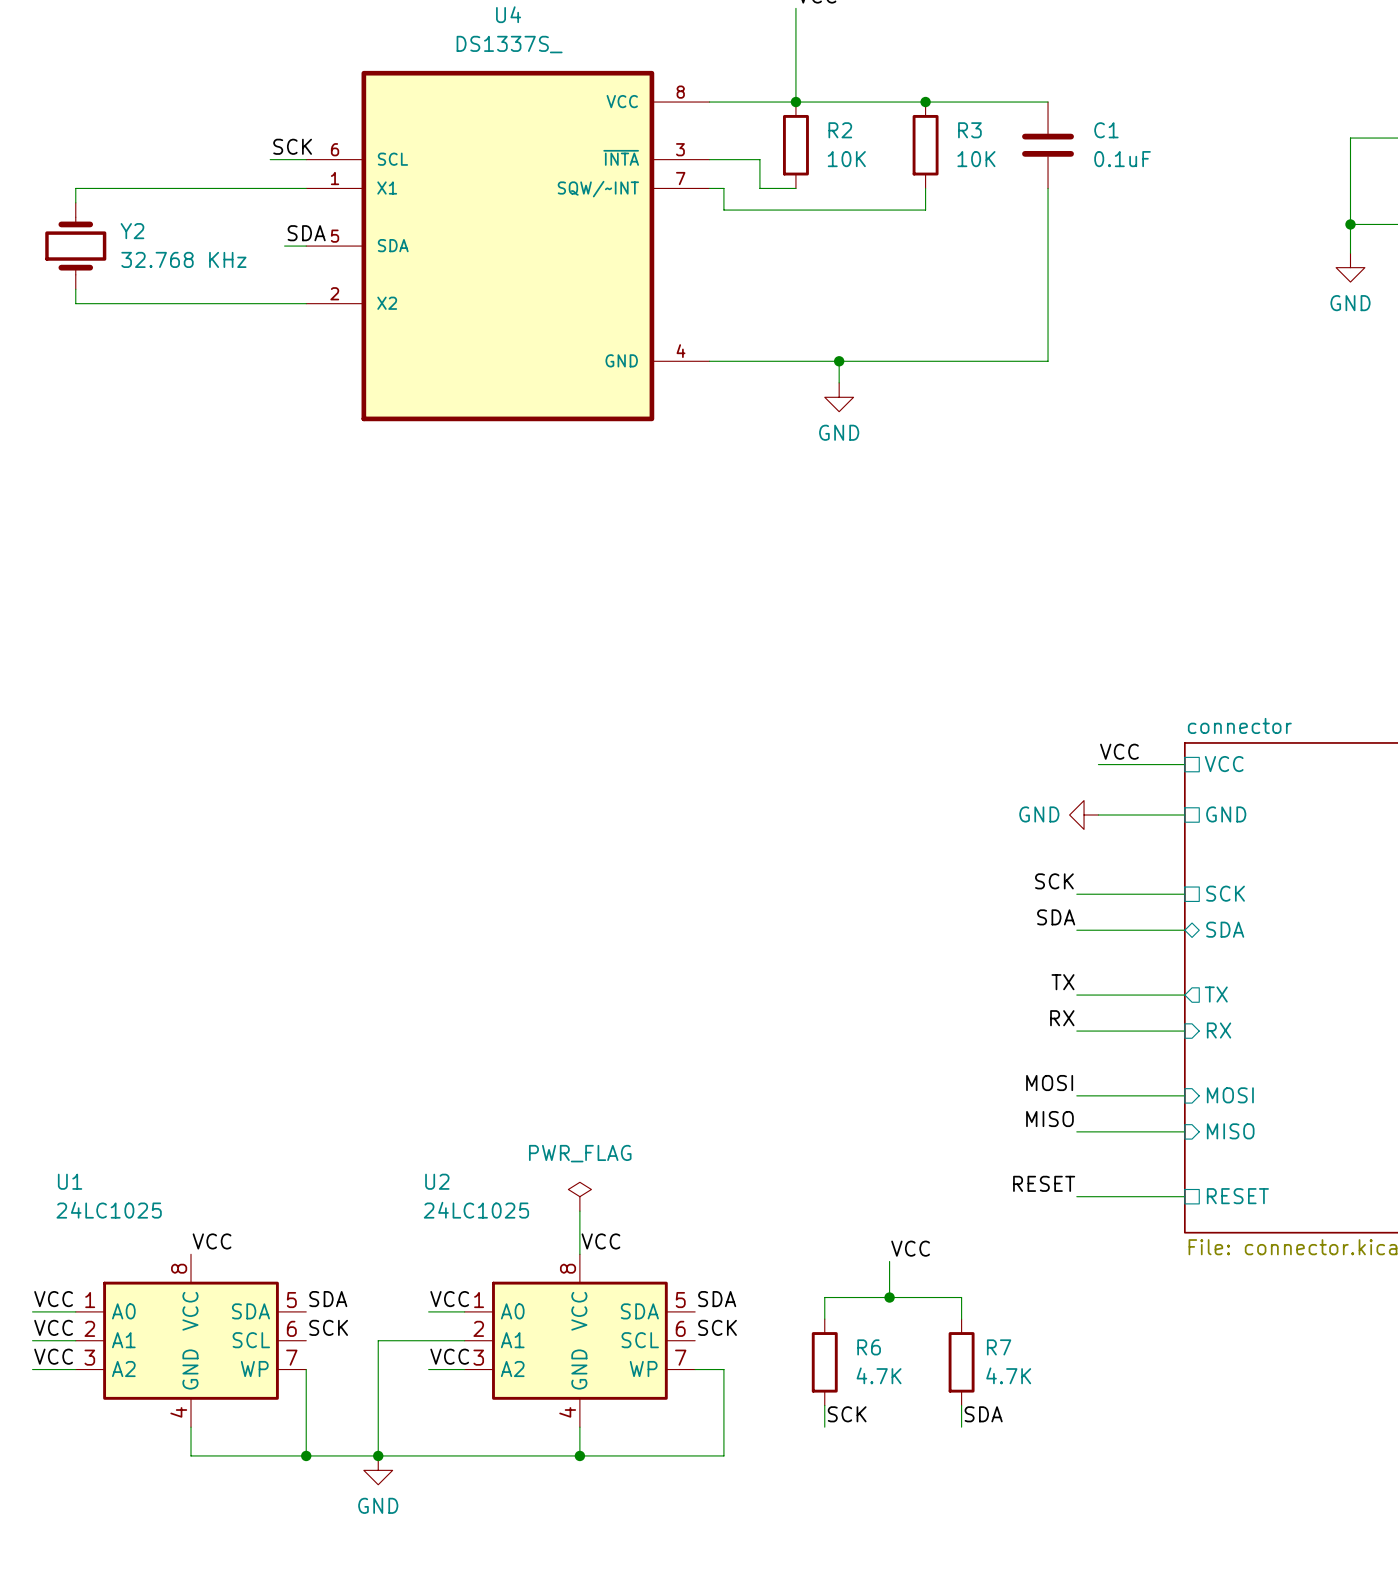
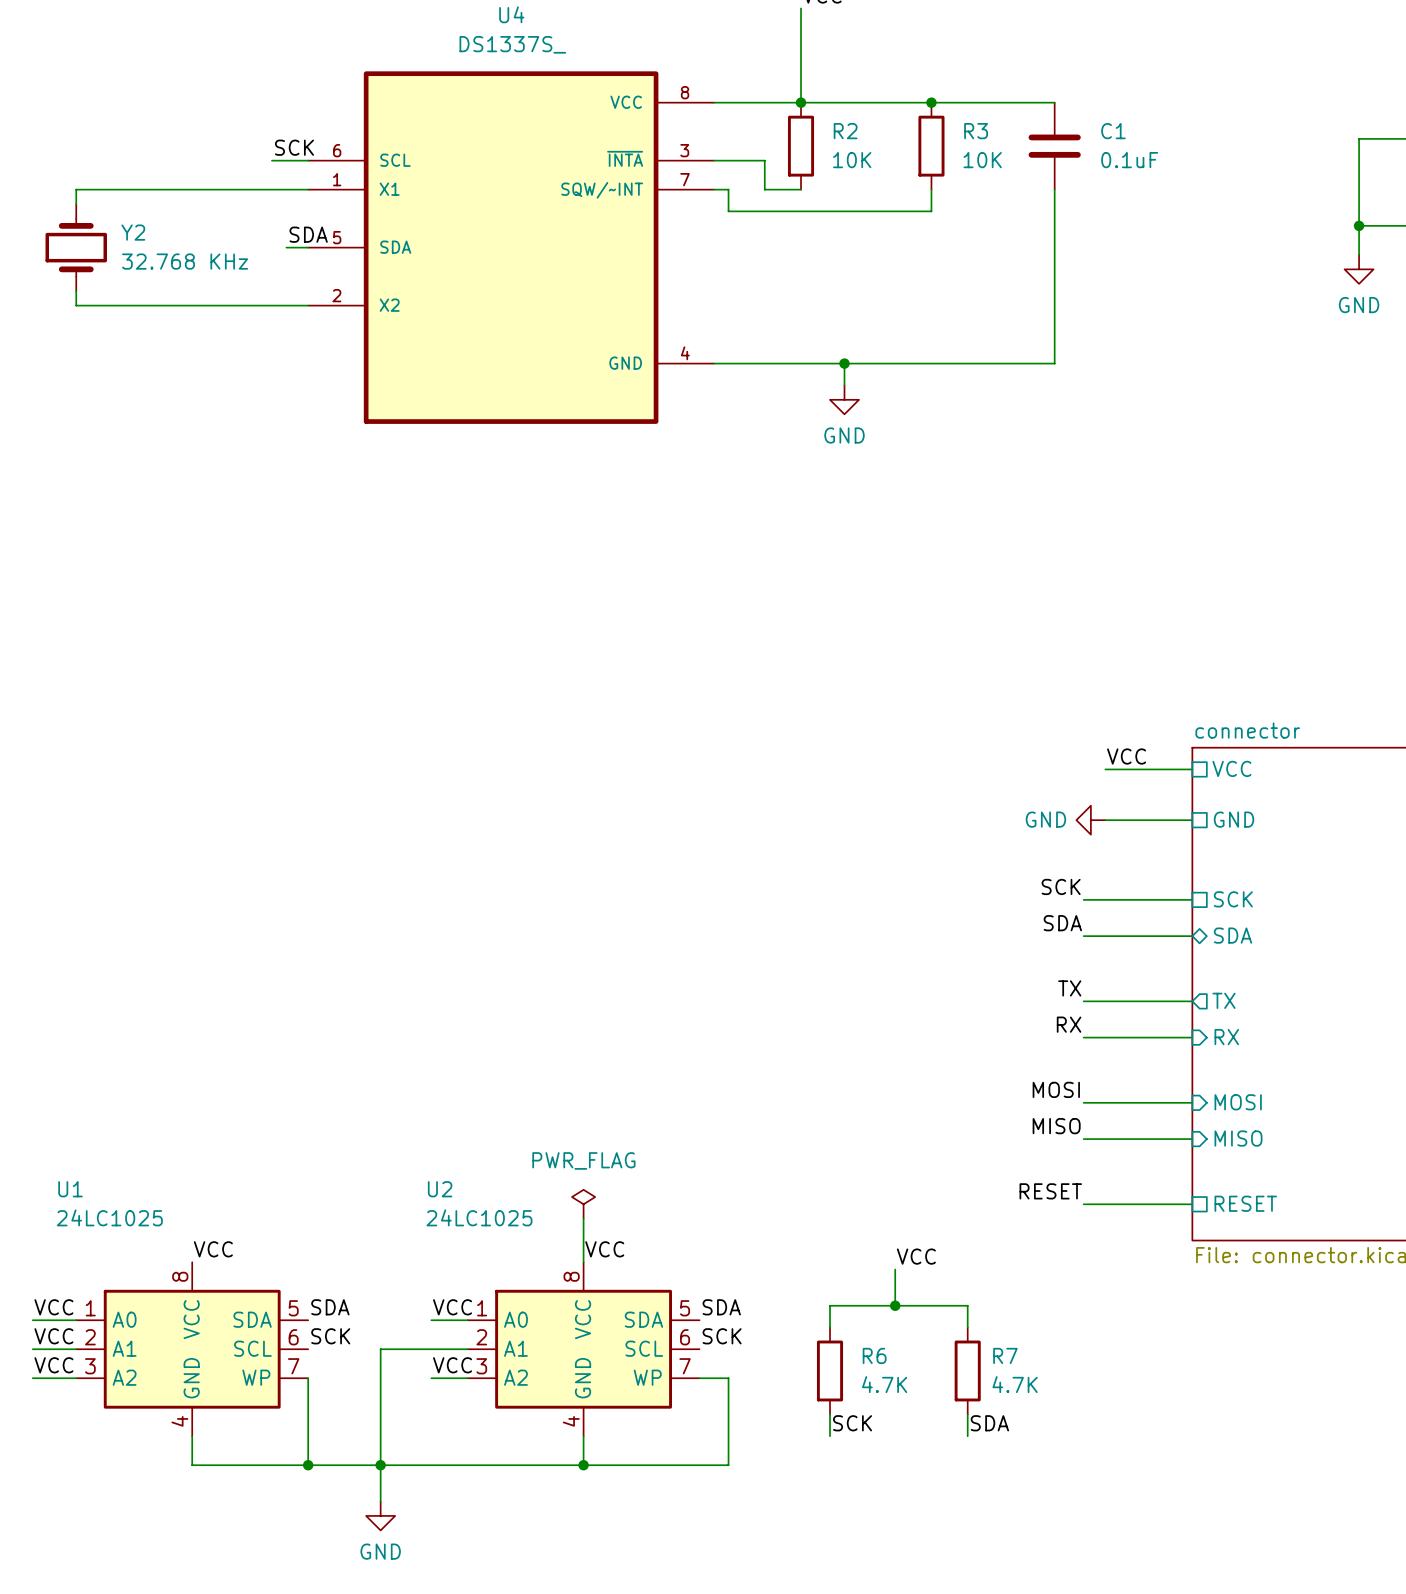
wire: none -> (380, 1465) (380, 1501)
power symbol position: GND (378, 1470) -> GND (380, 1515)

